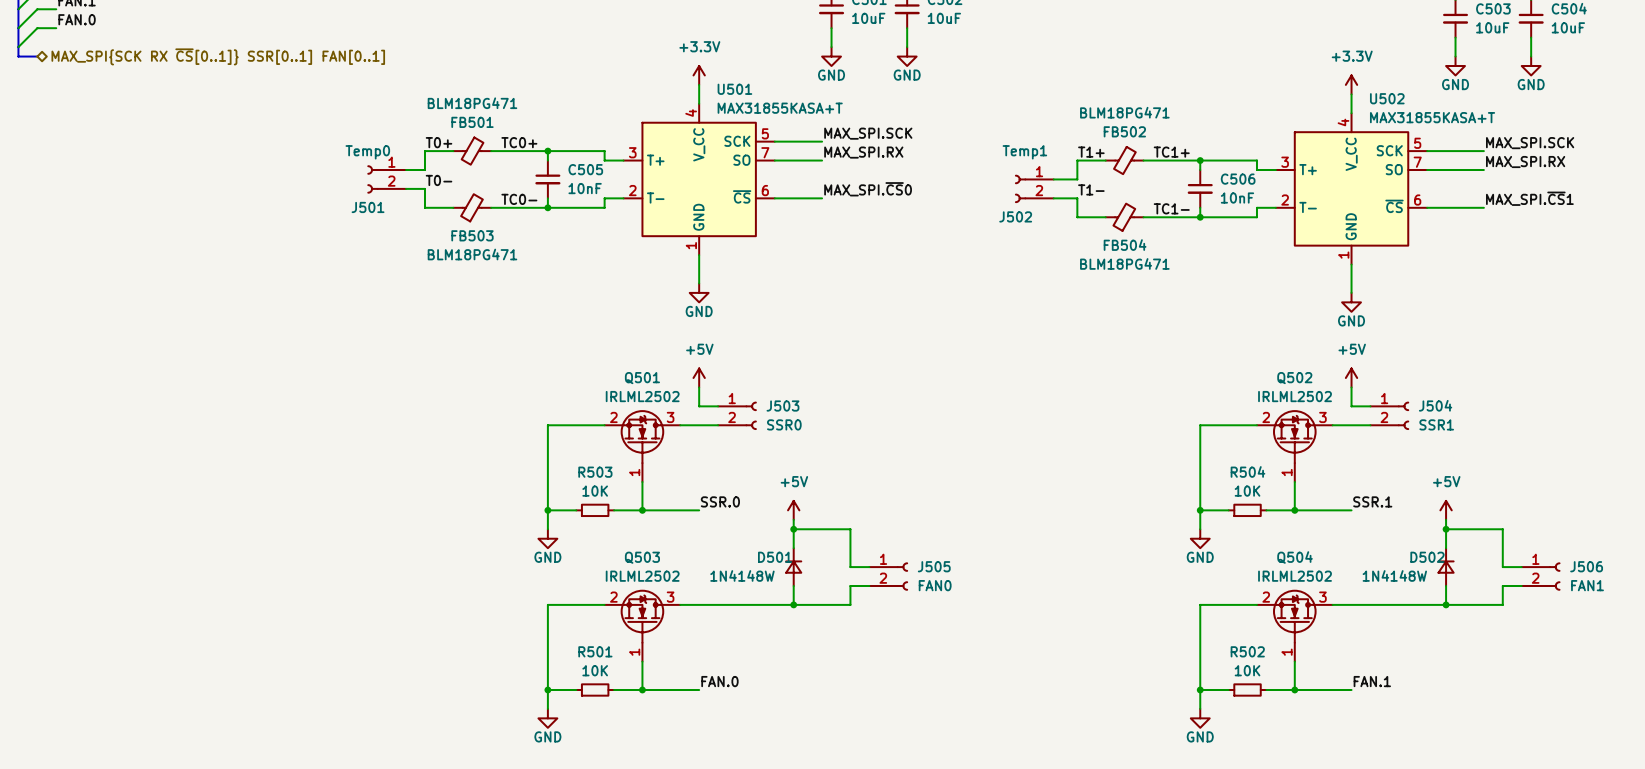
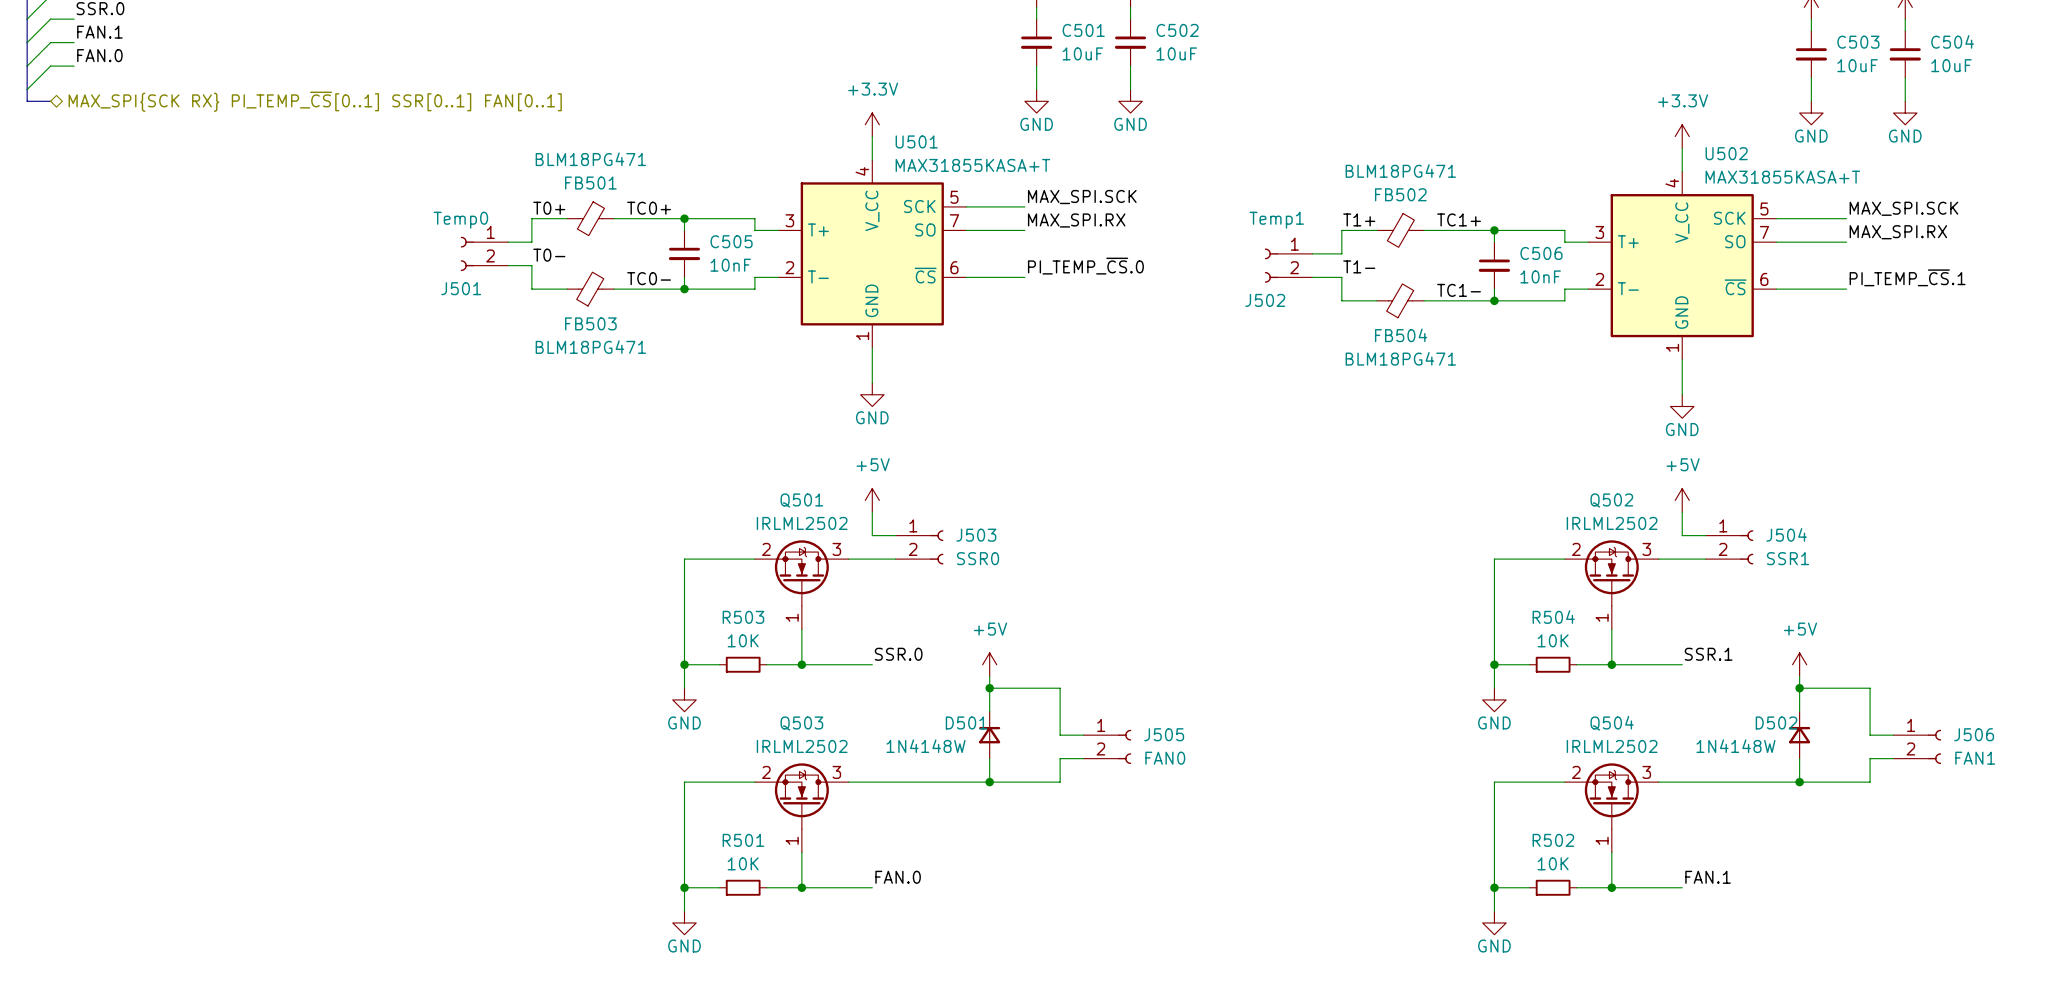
hierarchical label: MAX_SPI{SCK RX ~{CS}[0..1]} SSR[0..1] FAN[0..1] (218, 56) -> MAX_SPI{SCK RX} PI_TEMP_~{CS}[0..1] SSR[0..1] FAN[0..1] (315, 101)
label: MAX_SPI.~{CS}0 (868, 189) -> PI_TEMP_~{CS}.0 (1085, 266)
label: MAX_SPI.~{CS}1 (1529, 198) -> PI_TEMP_~{CS}.1 (1907, 277)

